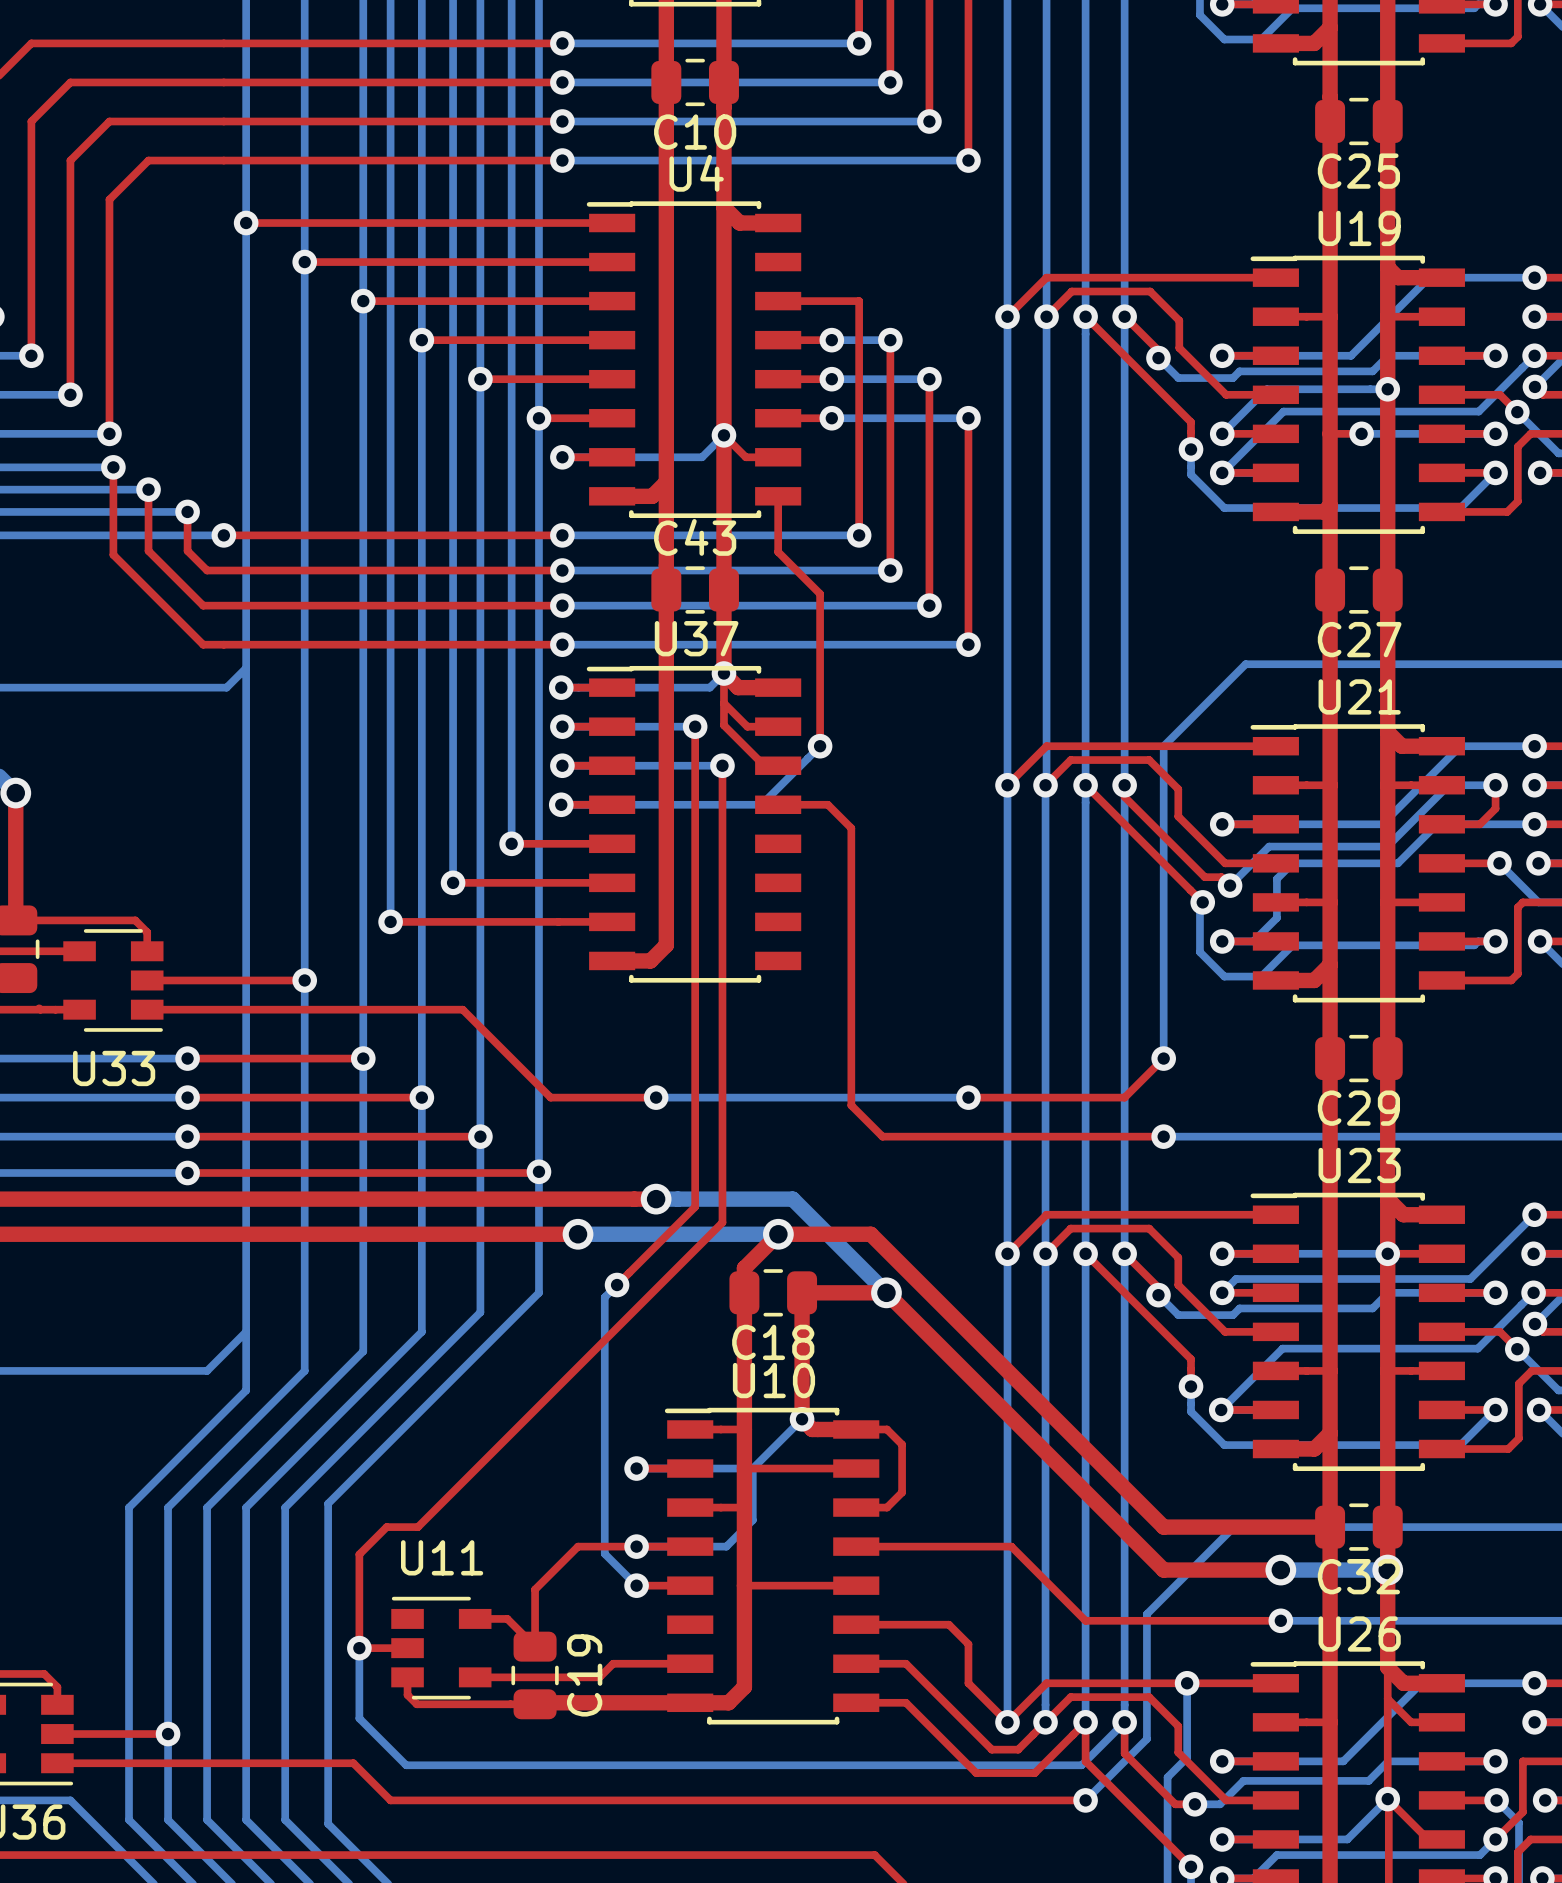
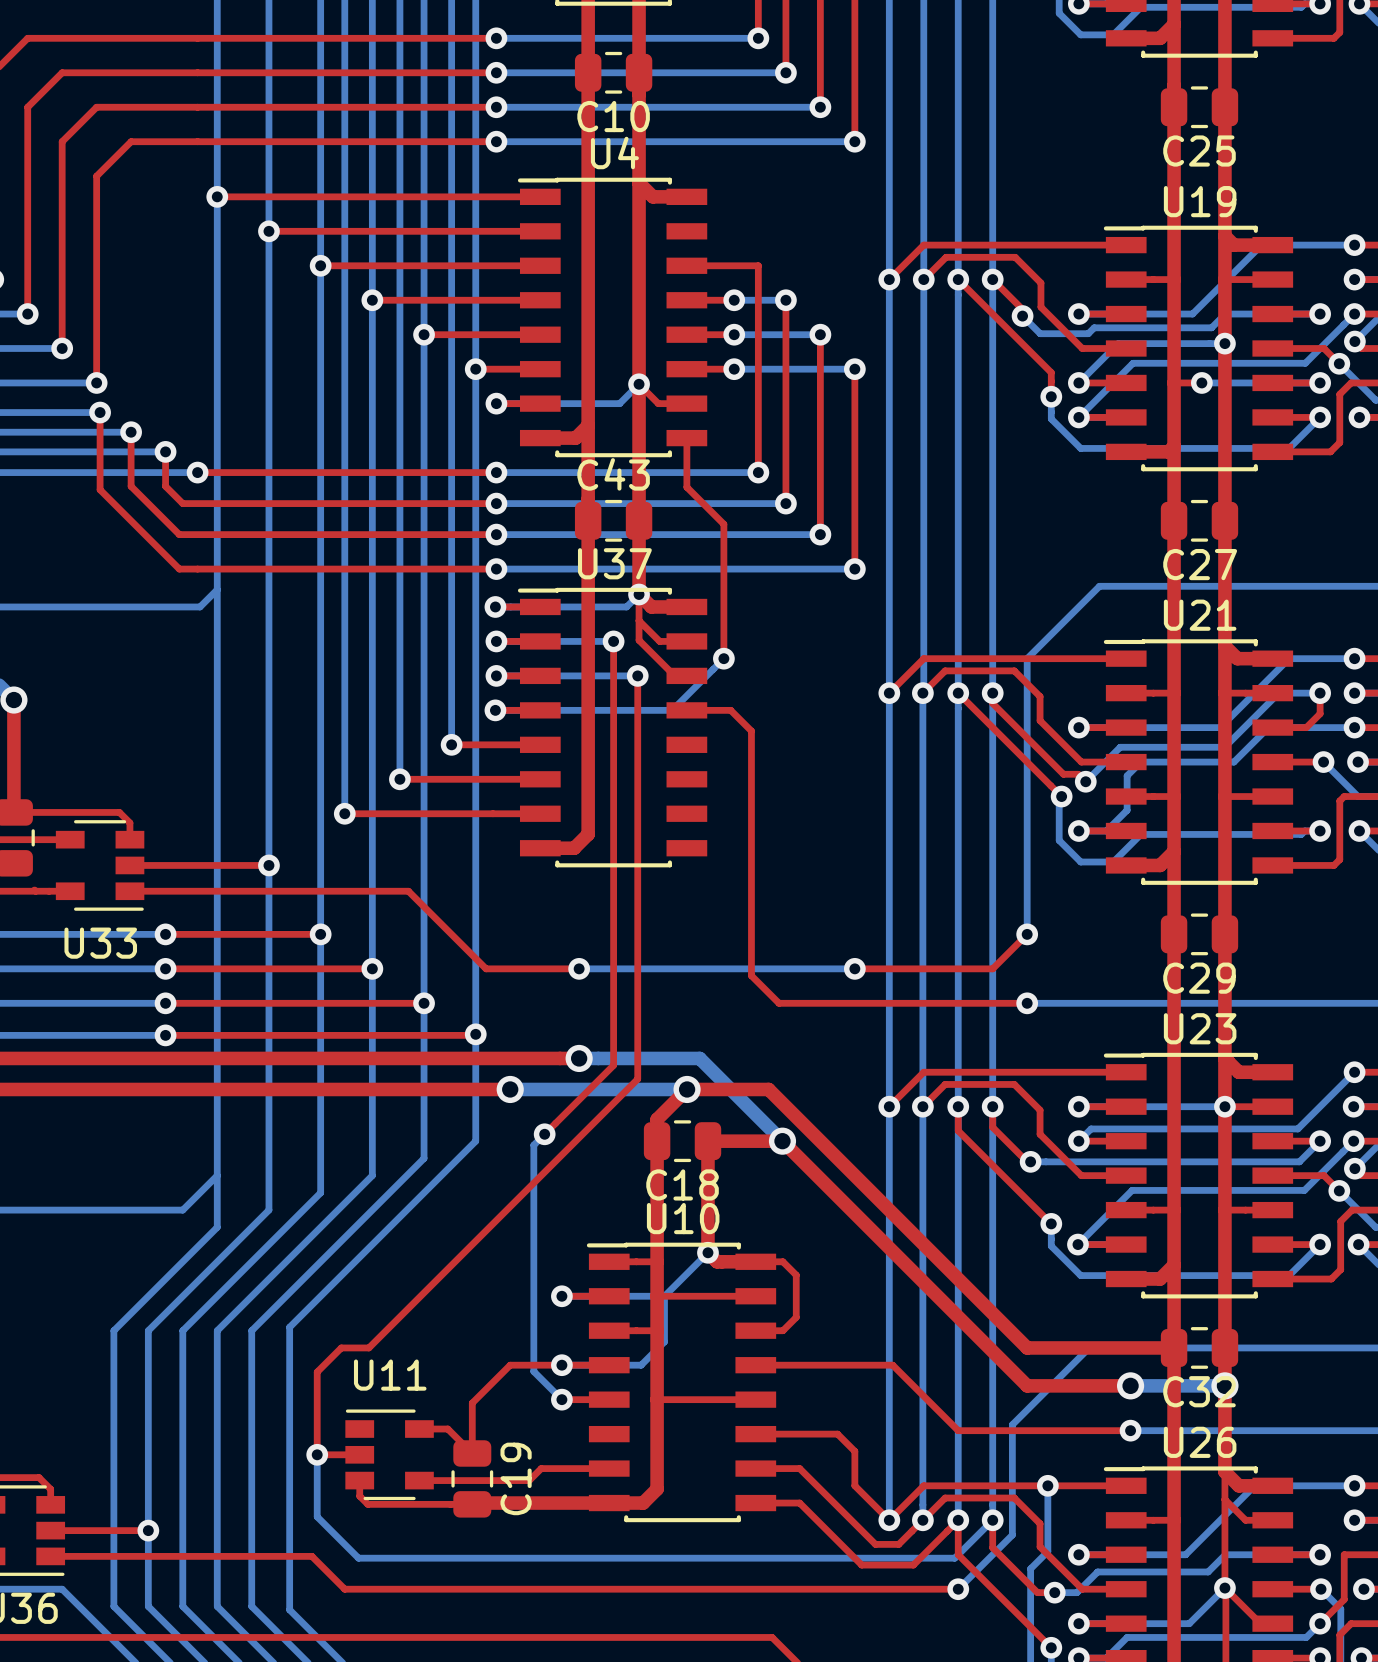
top track: (1085, 1253) (1191, 1359) (1191, 1386) -> (958, 1106) (958, 1130) (1051, 1223)
top track: (1124, 1253) (1158, 1287) (1158, 1295) -> (992, 1106) (992, 1127) (1027, 1161) (1030, 1161)
bottom track: (1495, 1292) (1388, 1292) (1372, 1308) (1239, 1308) (1232, 1315) (1178, 1315) (1158, 1295) -> (1320, 1141) (1299, 1161) (1030, 1161)
via position: (1158, 1295) -> (1030, 1161)

